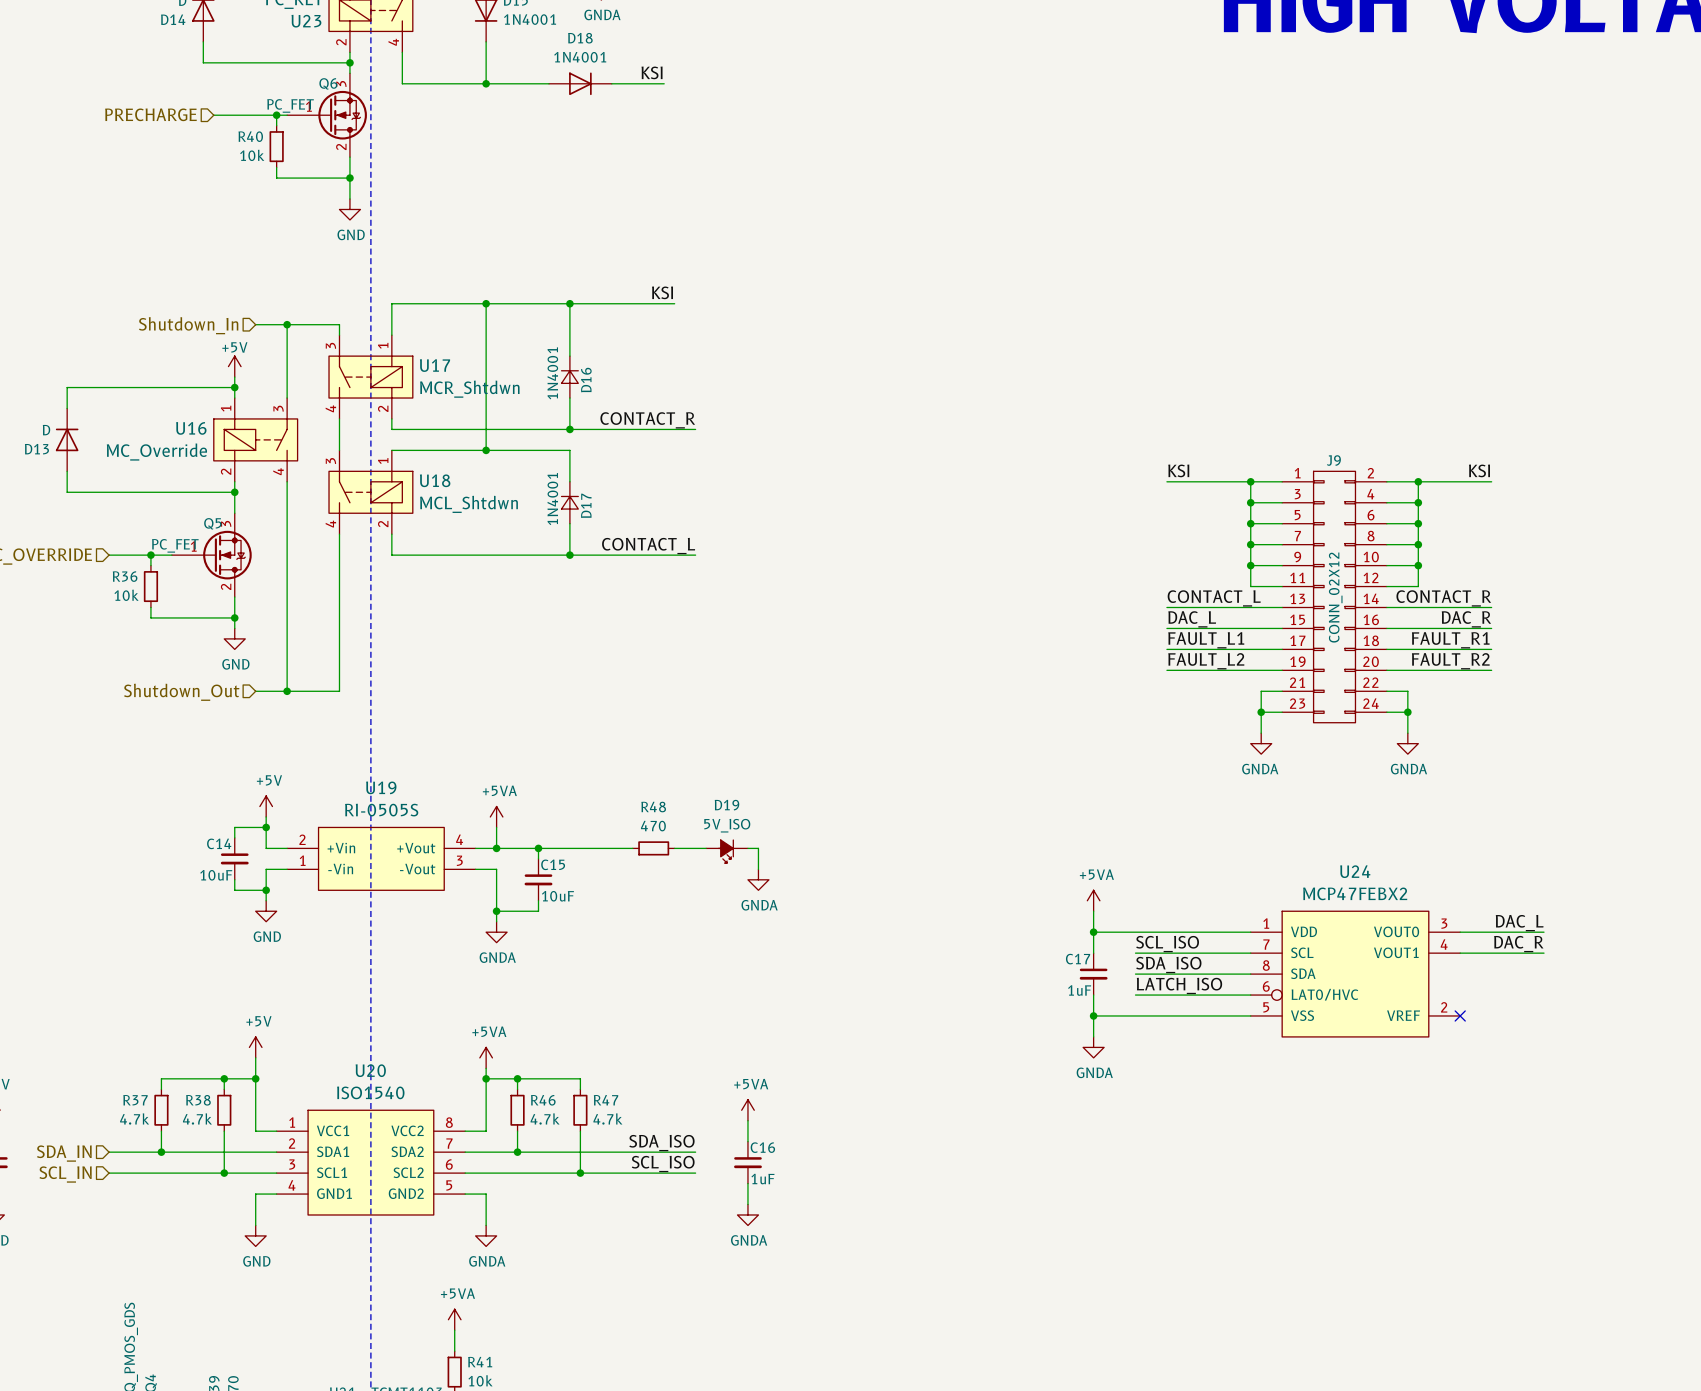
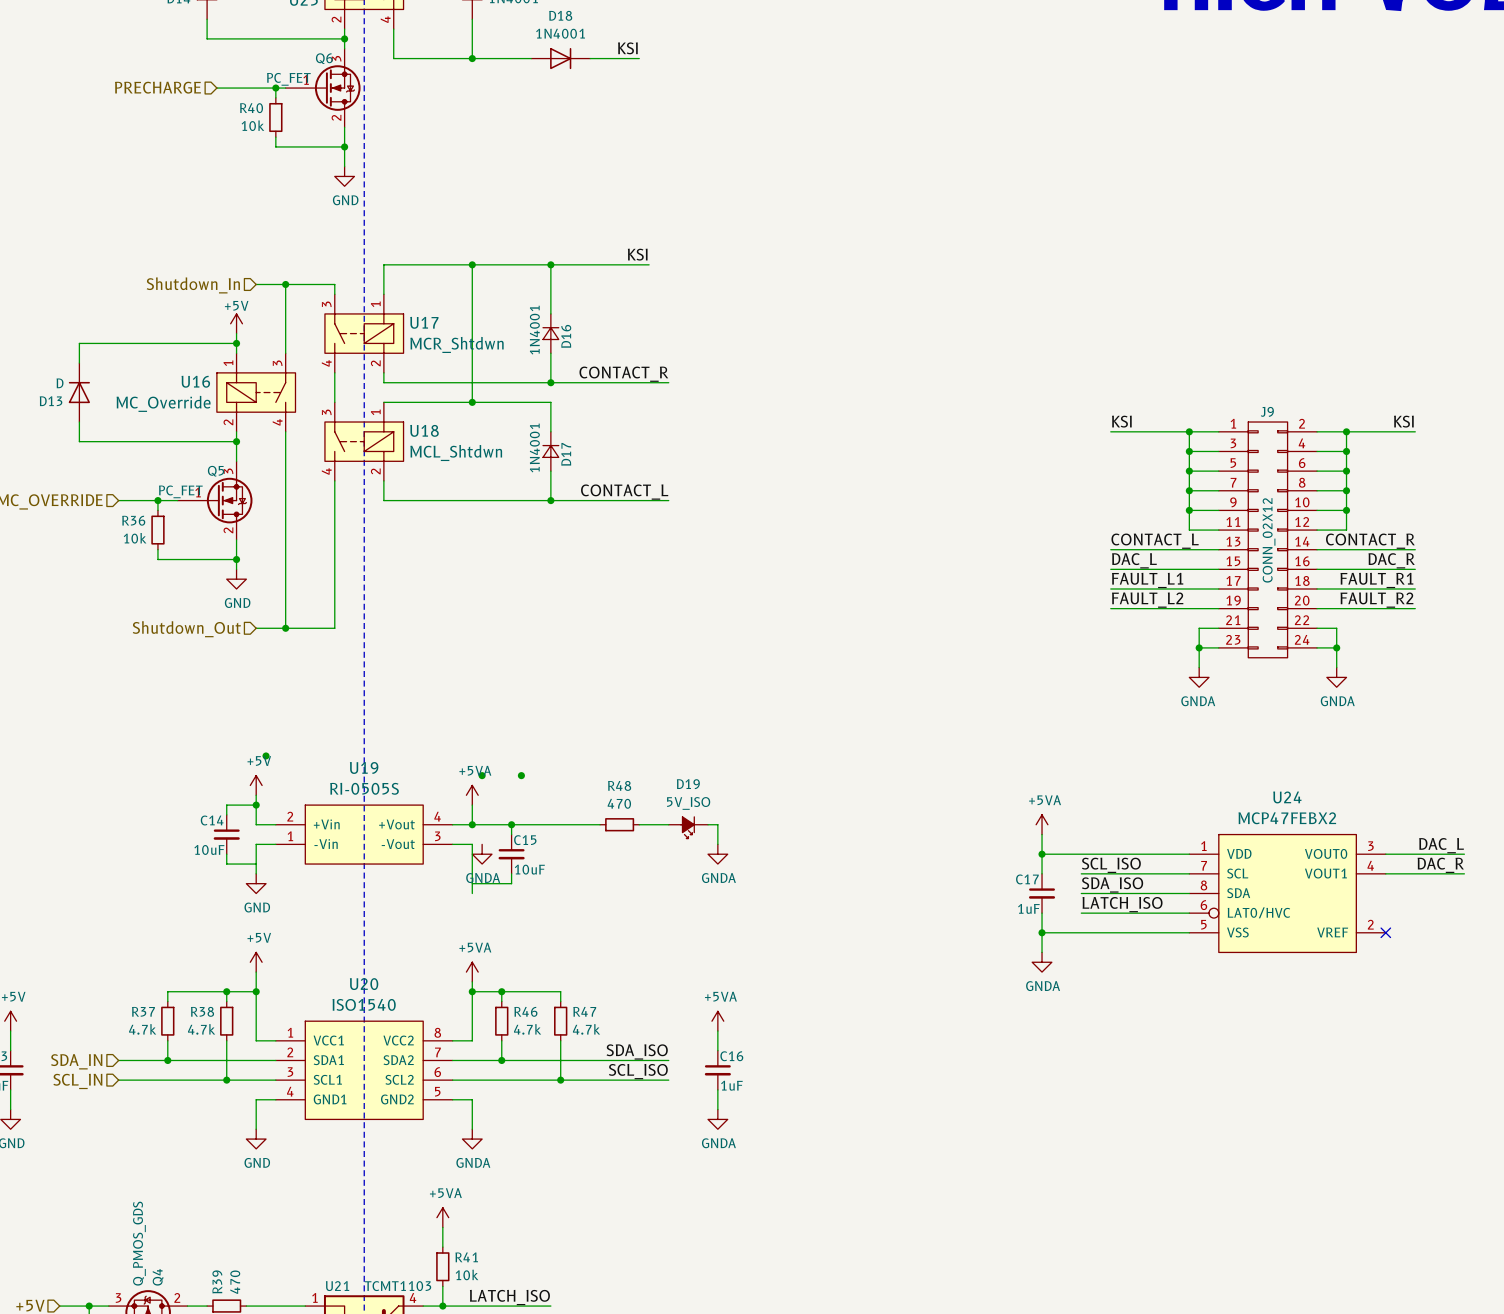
power symbol position: +5V (266, 806) -> +5V (256, 785)
wire: (266, 816) (266, 848) (287, 848) -> (256, 795) (256, 824) (275, 824)
power symbol position: +5VA (496, 816) -> +5VA (472, 795)
wire: (266, 827) (234, 827) (234, 837) -> (256, 805) (226, 805) (226, 814)
wire: (496, 827) (496, 848) -> (472, 805) (472, 824)
wire: (475, 848) (632, 848) -> (452, 824) (599, 824)
wire: (538, 848) (538, 858) -> (511, 824) (511, 834)
R48 position: (653, 848) -> (619, 824)
wire: (674, 848) (706, 848) -> (639, 824) (668, 824)
wire: (747, 848) (758, 848) (758, 869) -> (708, 824) (717, 824) (717, 844)
D19 position: (727, 851) -> (688, 827)
C14 position: (234, 858) -> (226, 834)
U19 position: (381, 858) -> (364, 834)
wire: (287, 869) (266, 869) (266, 900) -> (275, 844) (256, 844) (256, 873)
wire: (475, 869) (496, 869) (496, 921) -> (452, 844) (472, 844) (472, 893)
wire: (234, 879) (234, 890) (266, 890) -> (226, 854) (226, 864) (256, 864)
C15 position: (538, 879) -> (511, 854)
power symbol position: GNDA (758, 879) -> GNDA (717, 854)
junction position: (266, 890) -> (256, 805)
junction: none -> (511, 824)
wire: (538, 900) (538, 911) (496, 911) -> (511, 873) (511, 883) (472, 883)
power symbol position: GND (266, 911) -> GND (256, 883)
junction position: (496, 911) -> (472, 824)

